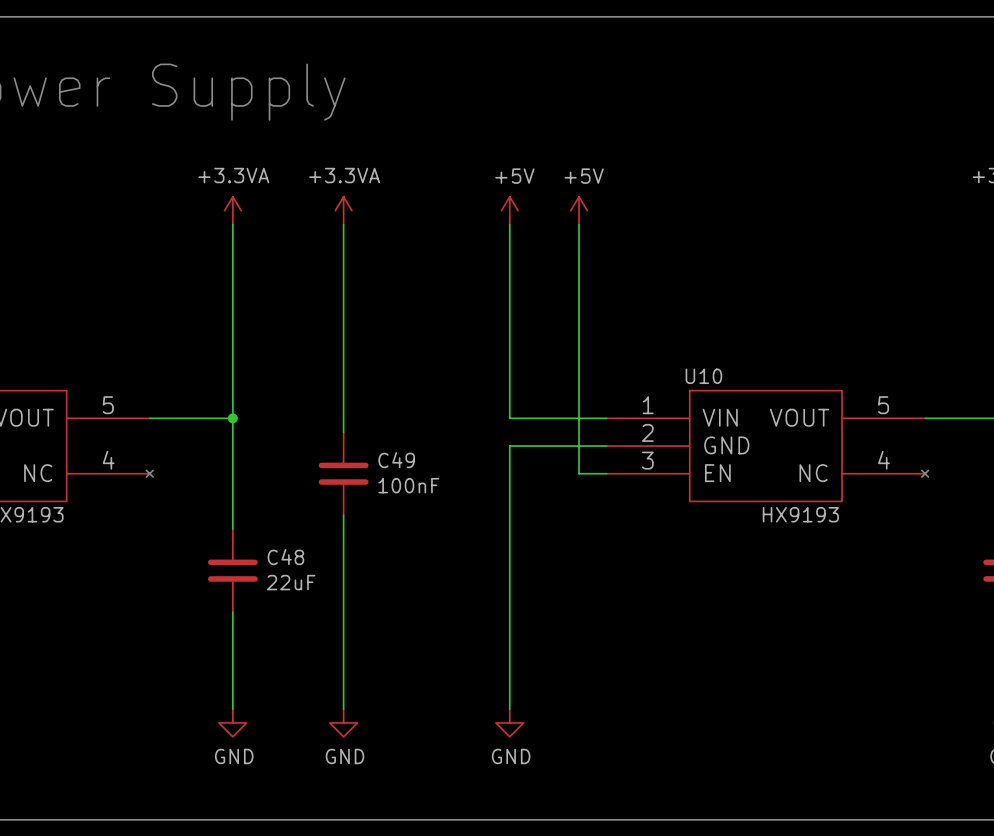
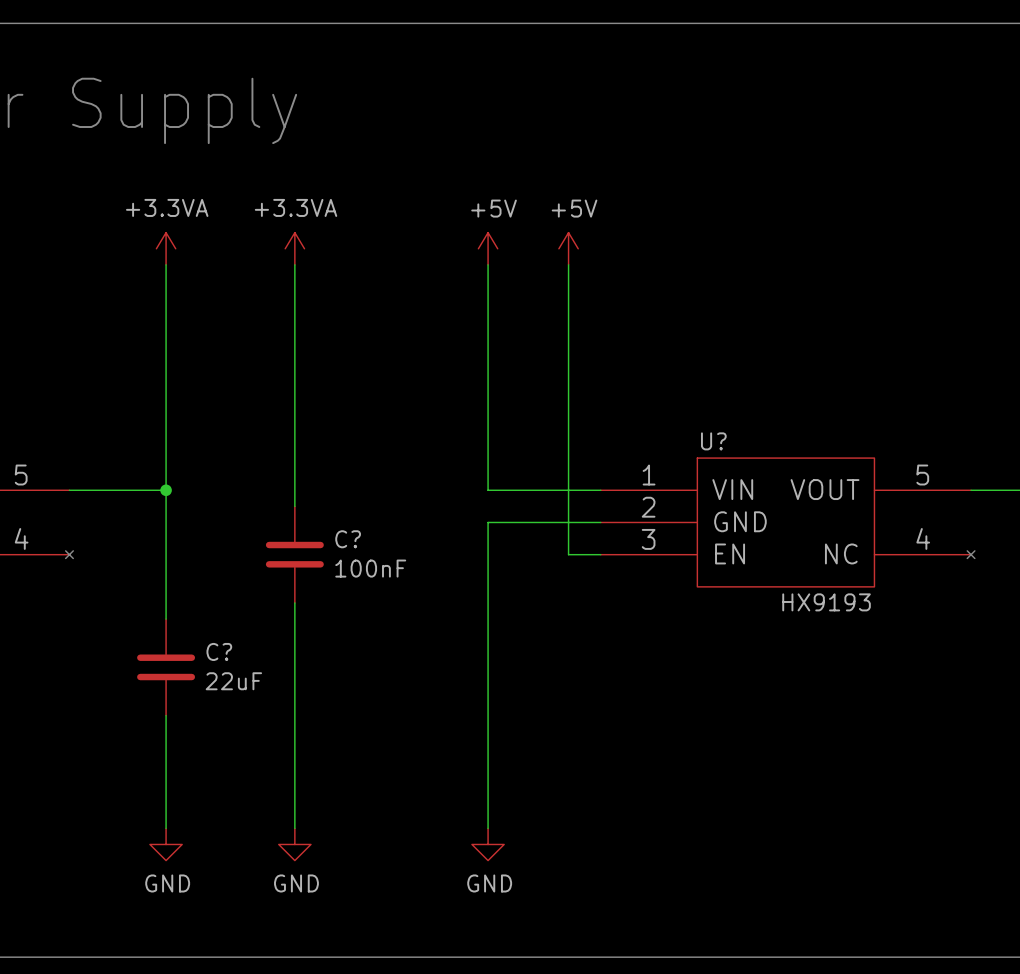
U10 name: U10 (703, 376) -> U? (713, 441)
C49 name: C49 (396, 460) -> C? (348, 539)
C48 name: C48 (285, 557) -> C? (219, 651)

